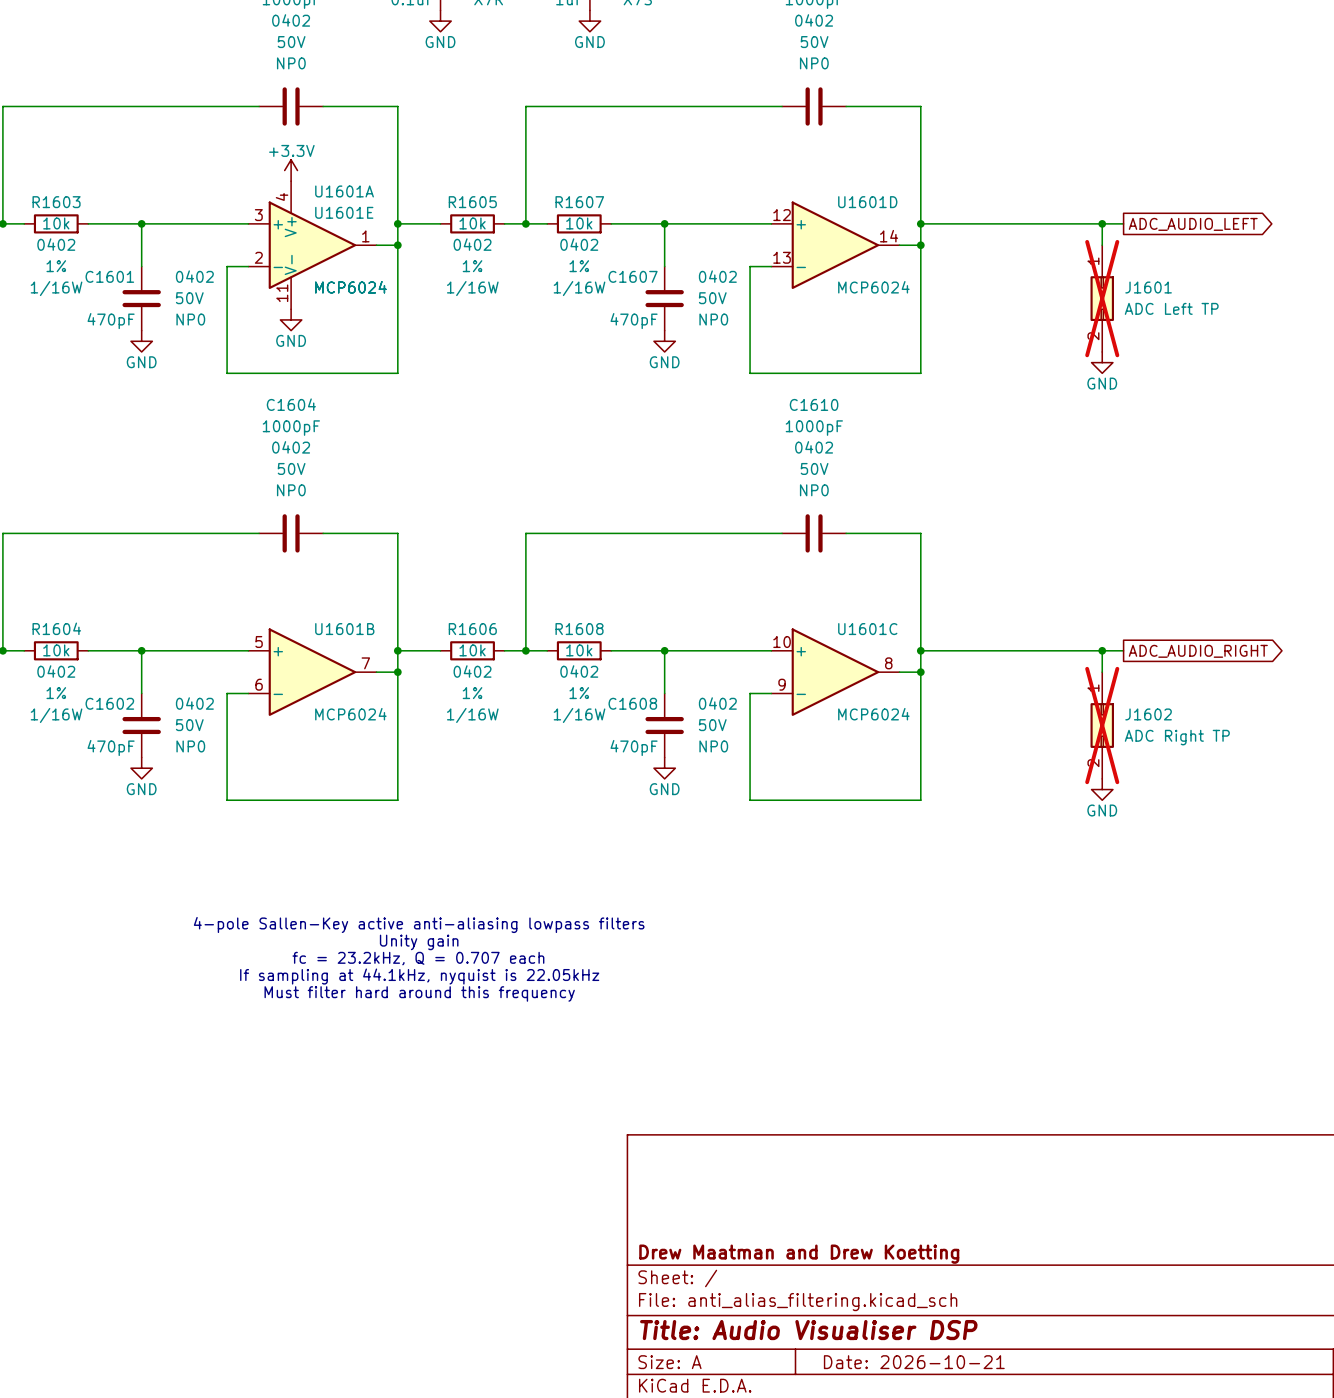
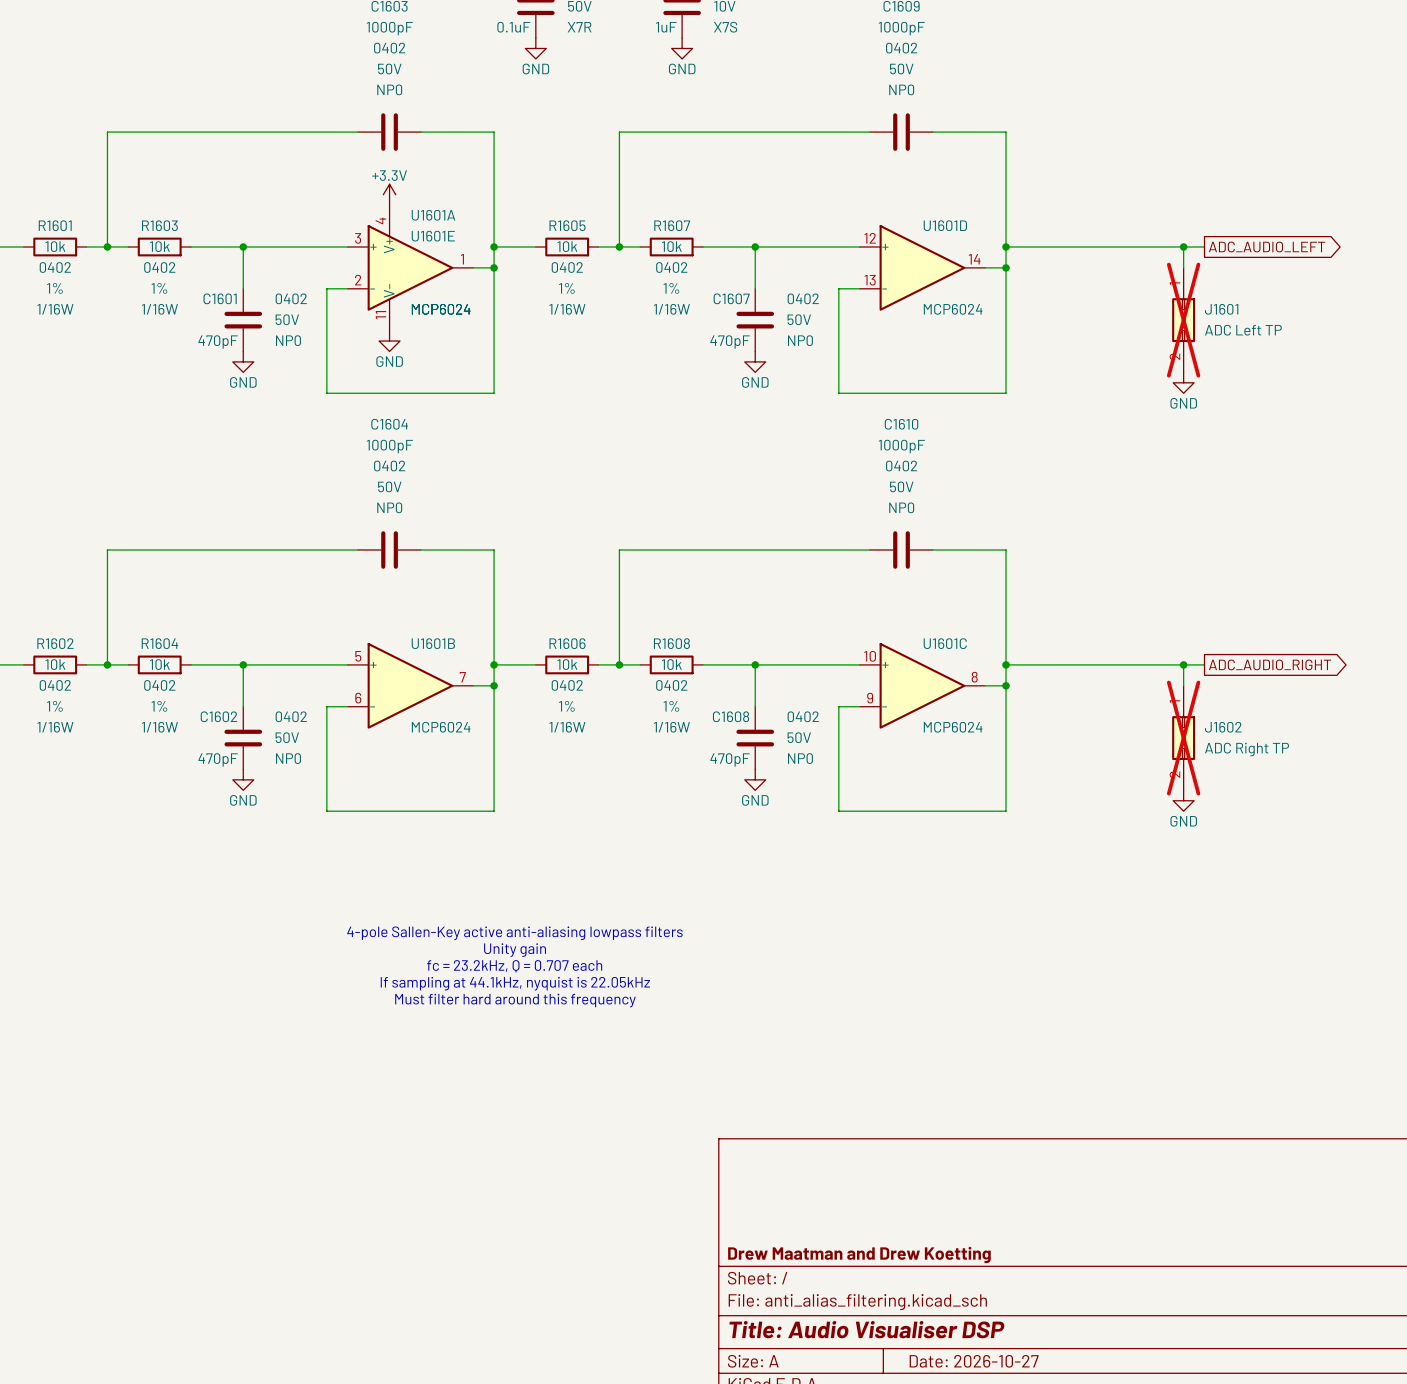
title block: Date: 2026-10-21 (914, 1362) -> Date: 2026-10-27 (974, 1361)

